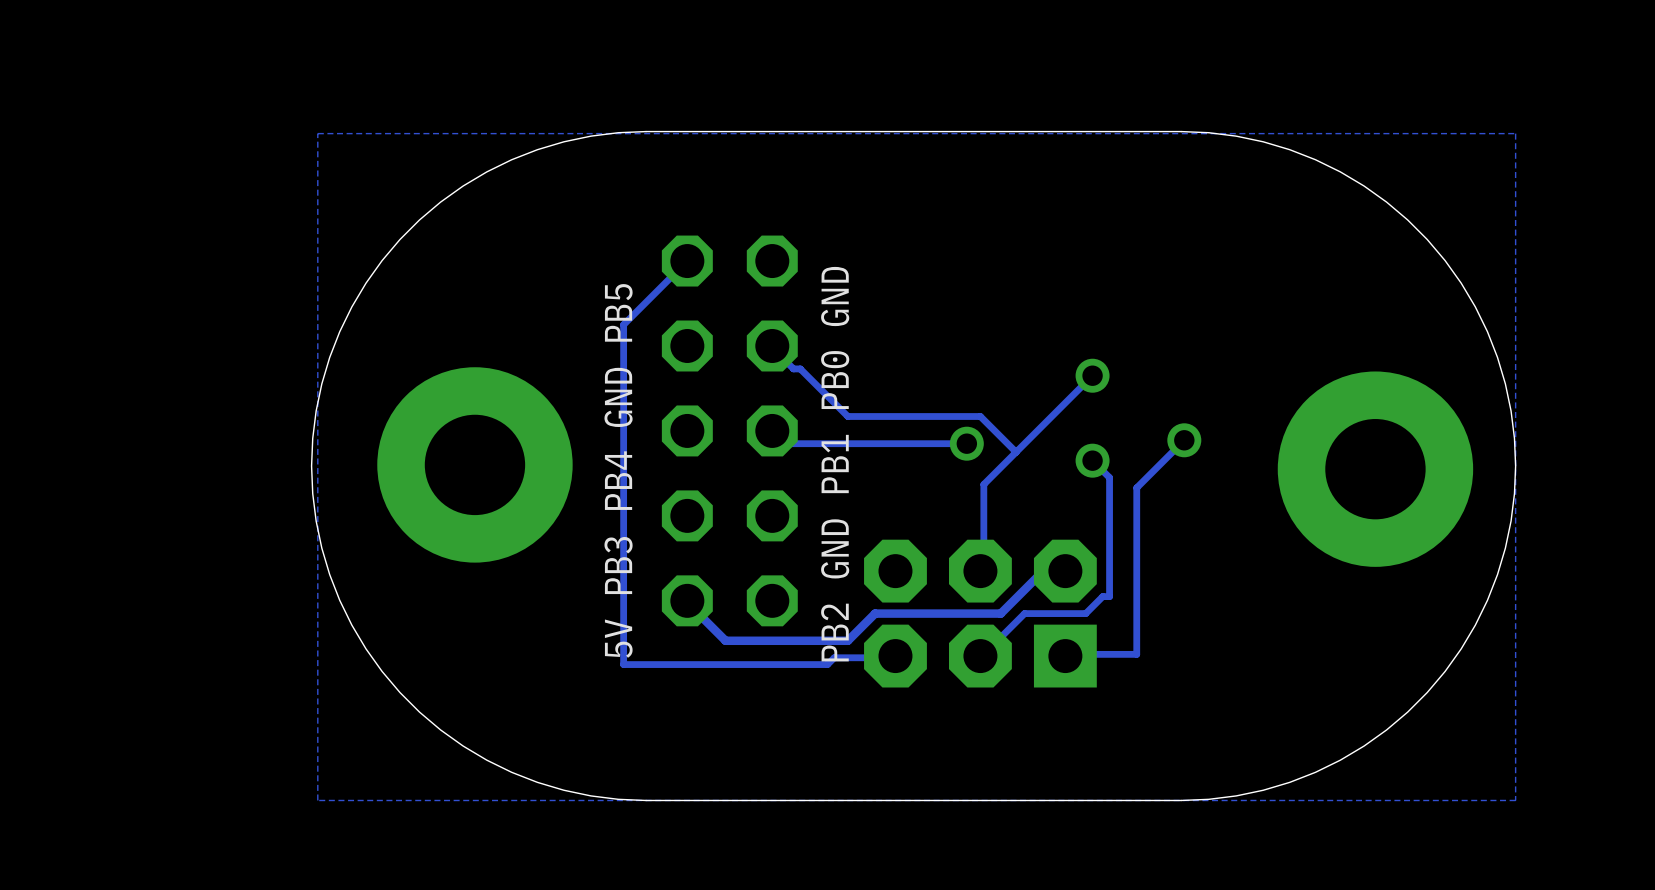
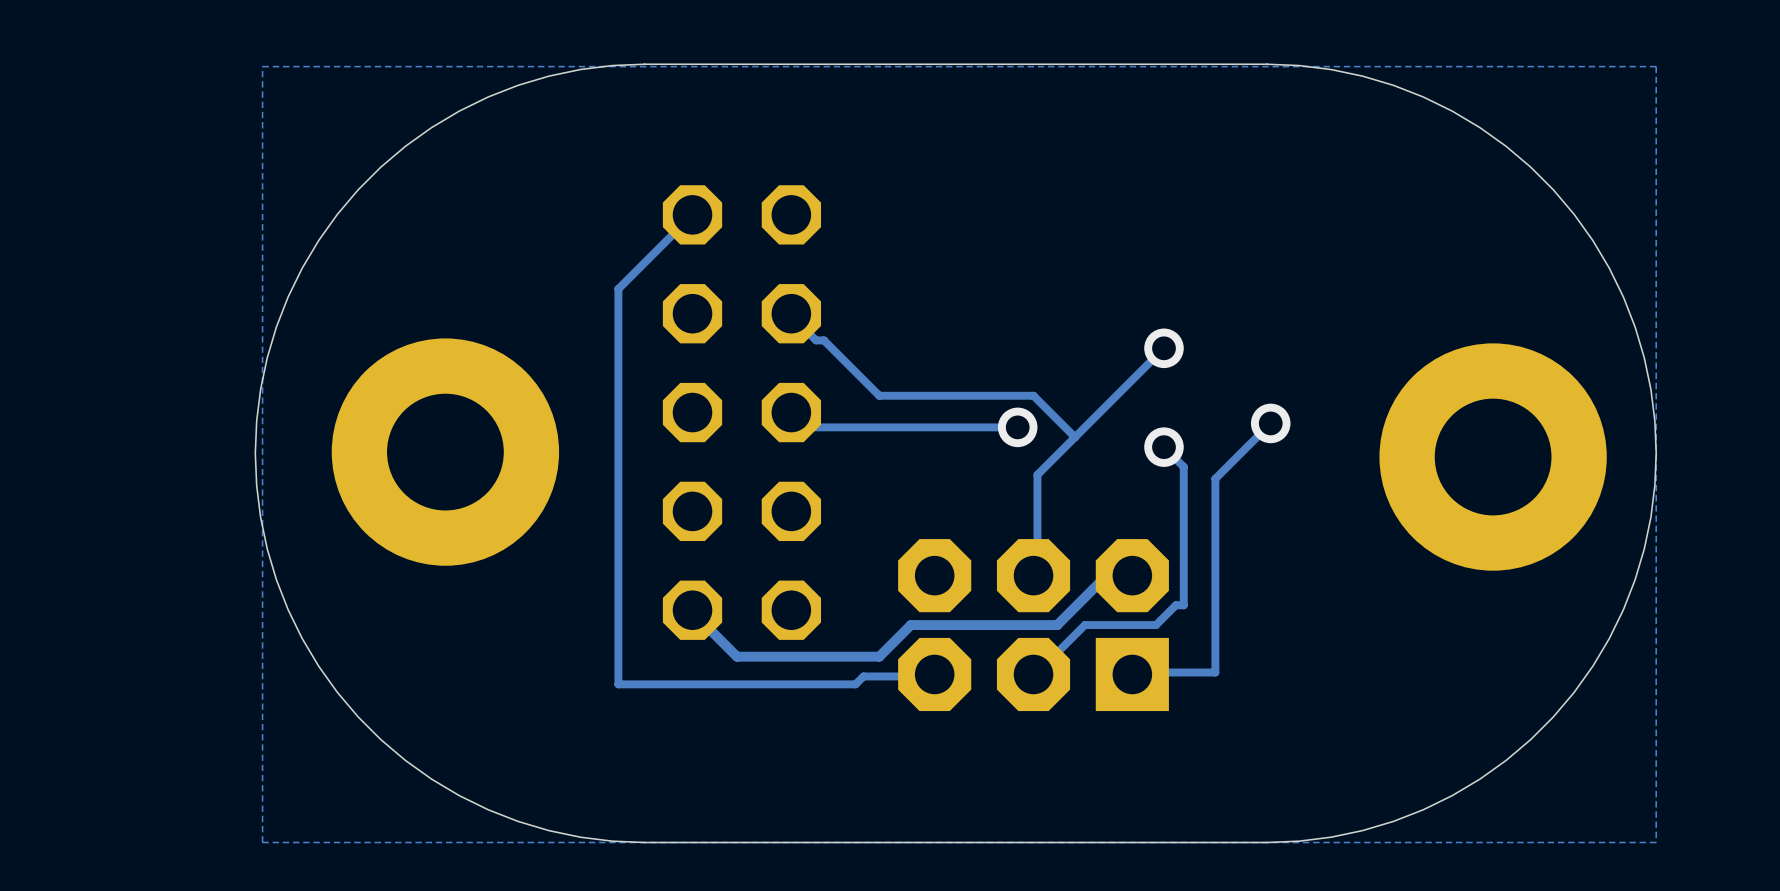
text: PB2 GND PB1 PB0 GND (835, 464) -> none
text: 5V PB3 PB4 GND PB5 (618, 470) -> none

